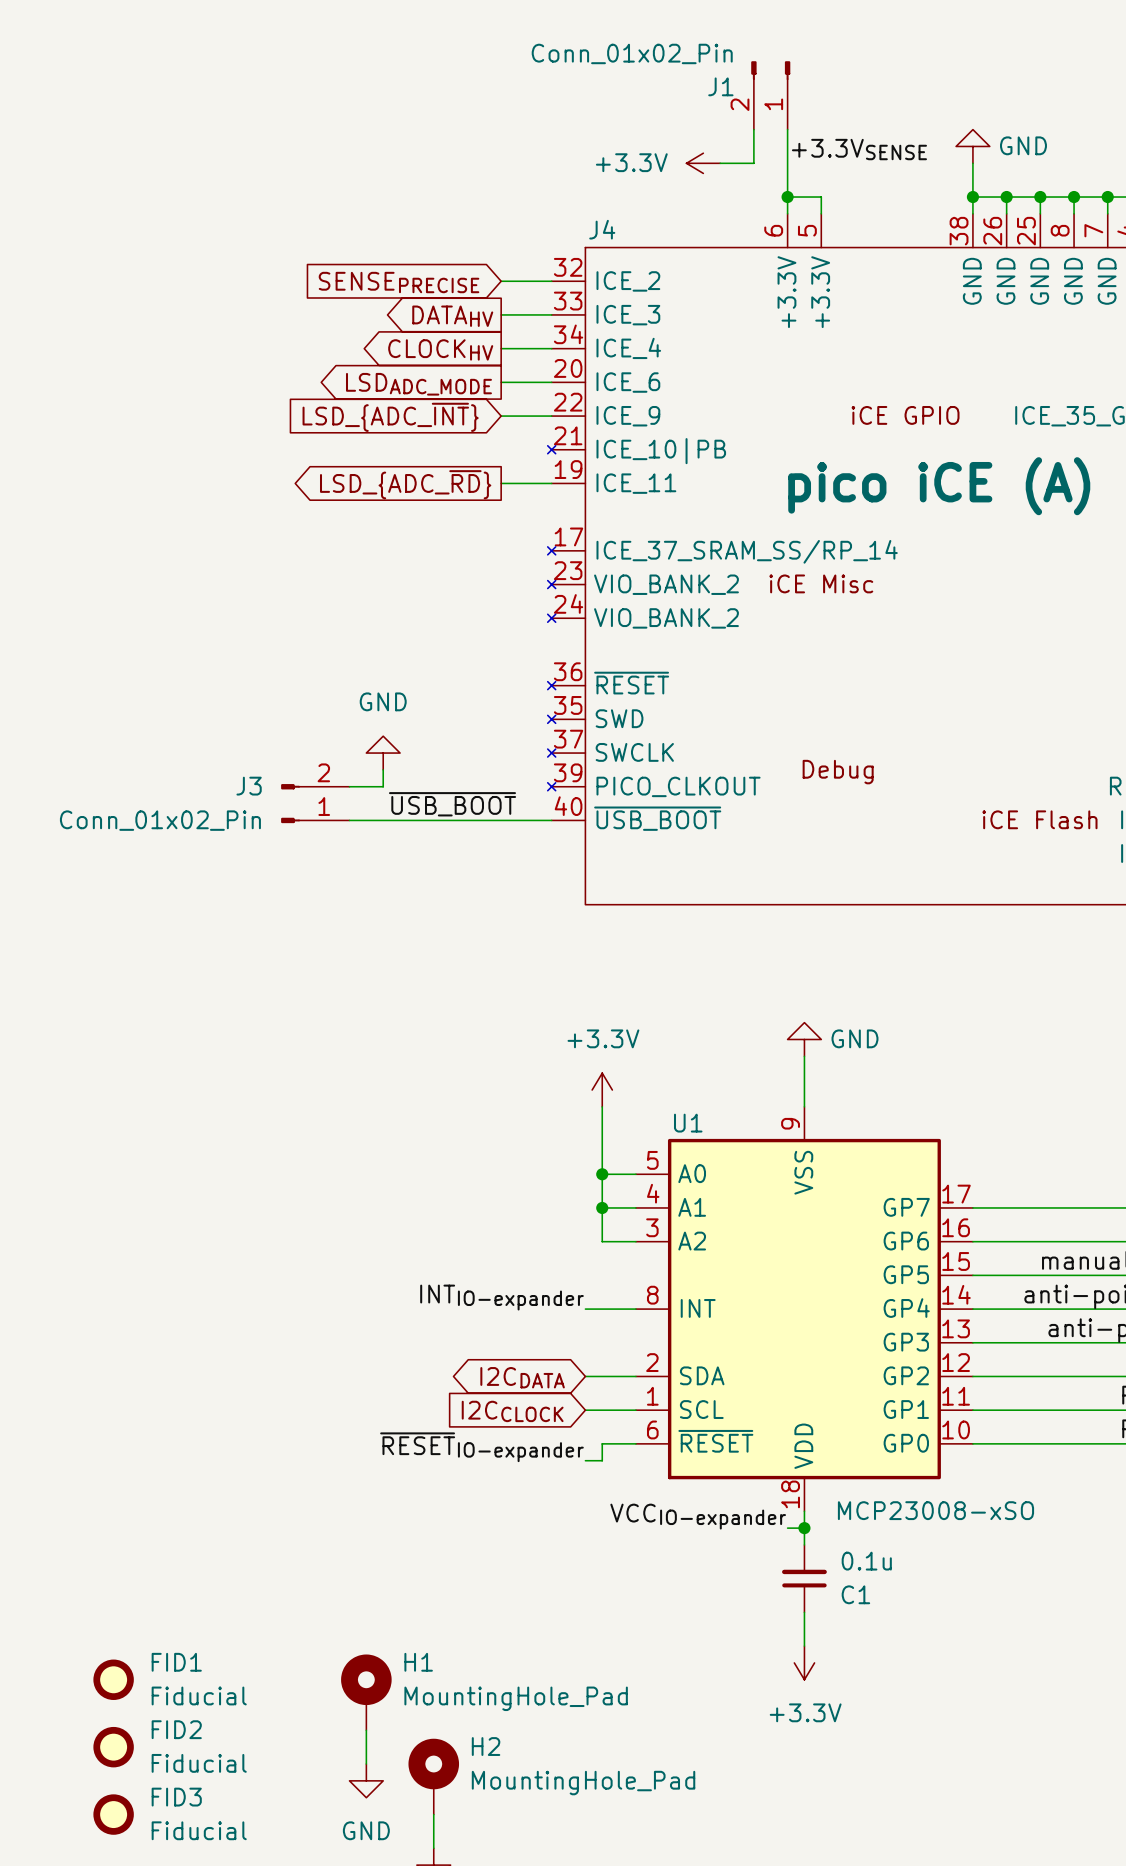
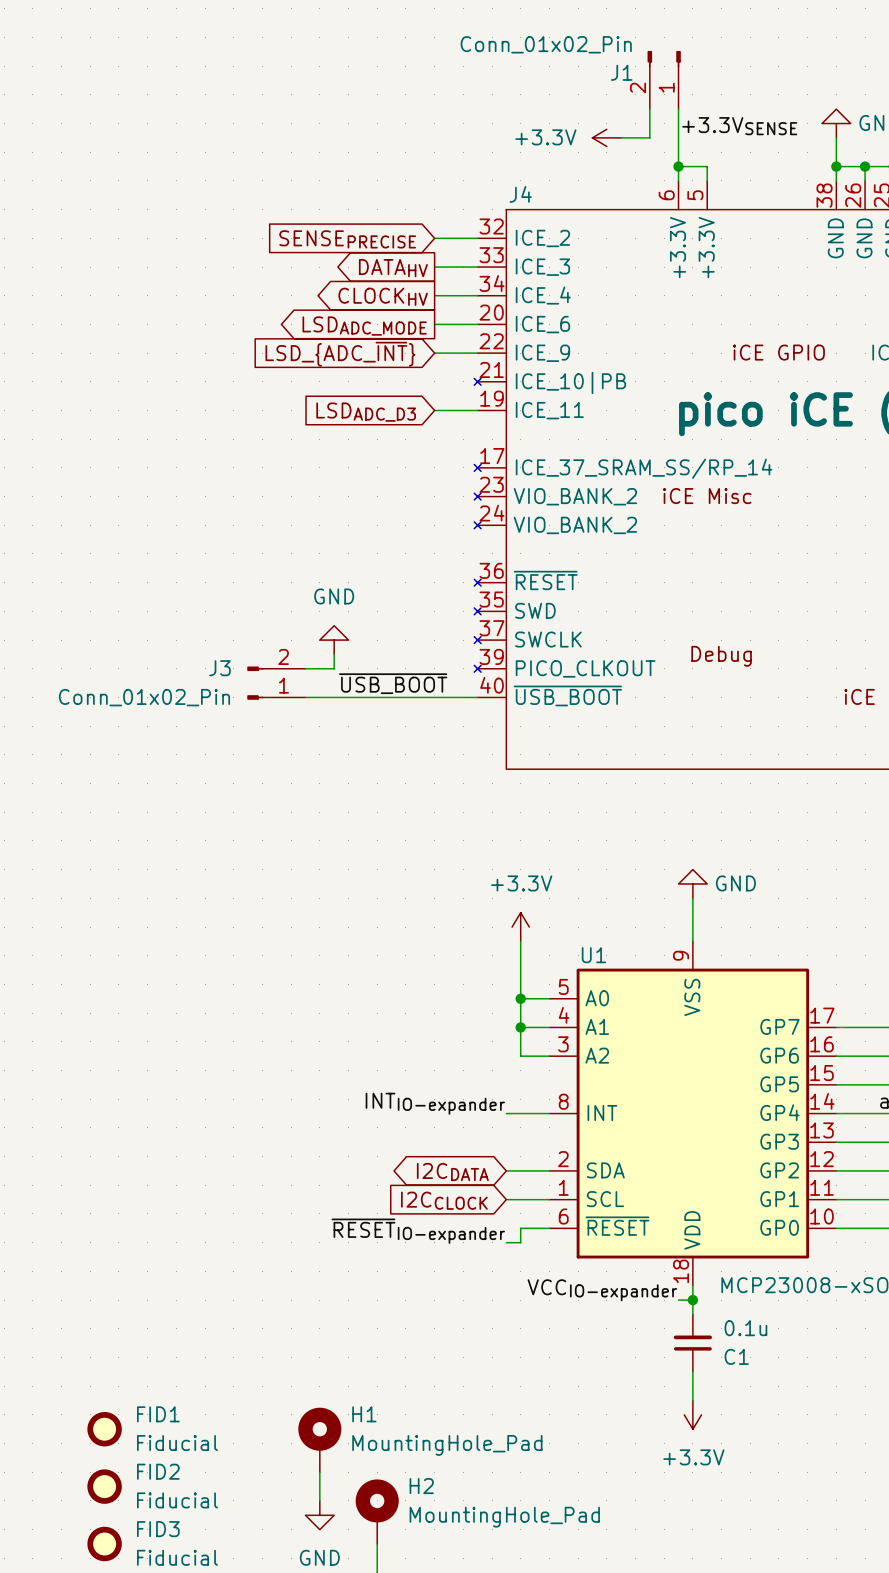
global label shape: output (405, 484) -> input (366, 412)
global label: LSD_{ADC_~{RD}} (405, 484) -> LSDADC_D3 (366, 412)

